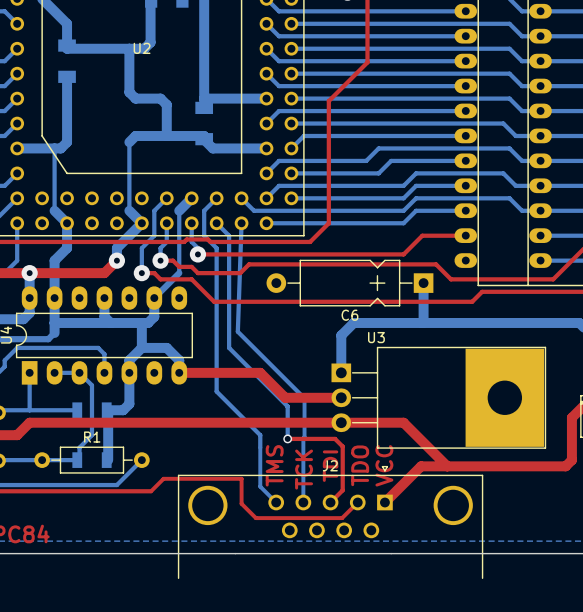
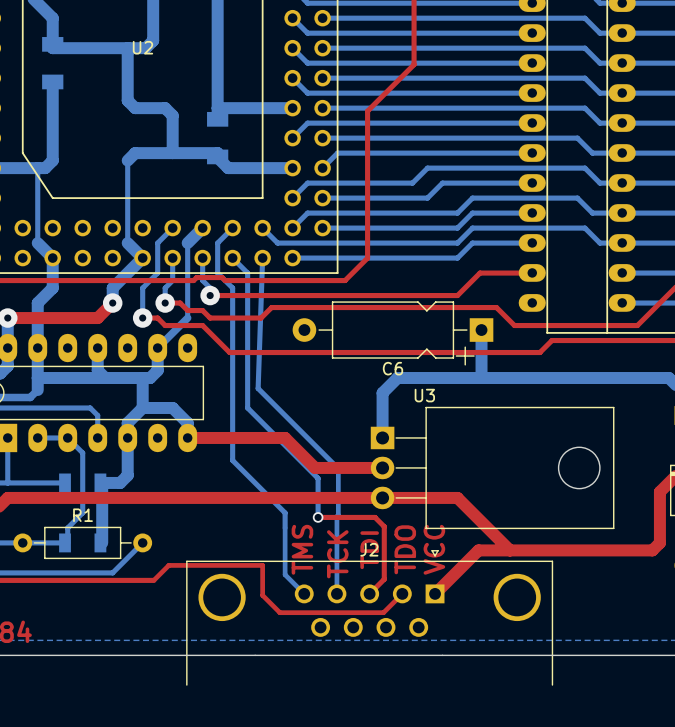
C6 footprint: [266, 259, 434, 307] -> [292, 301, 494, 366]
U3 footprint: [331, 346, 547, 449] -> [370, 406, 615, 530]

